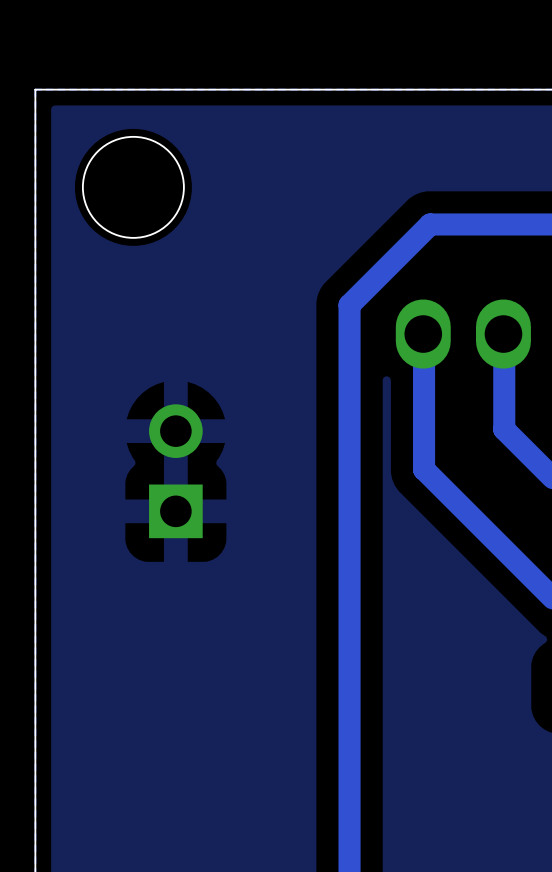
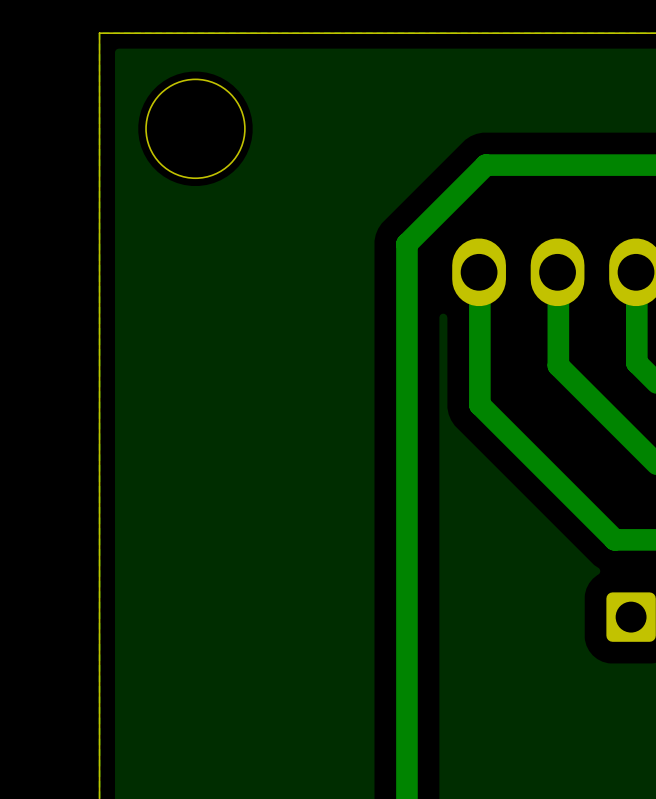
part: (175, 471) -> none

